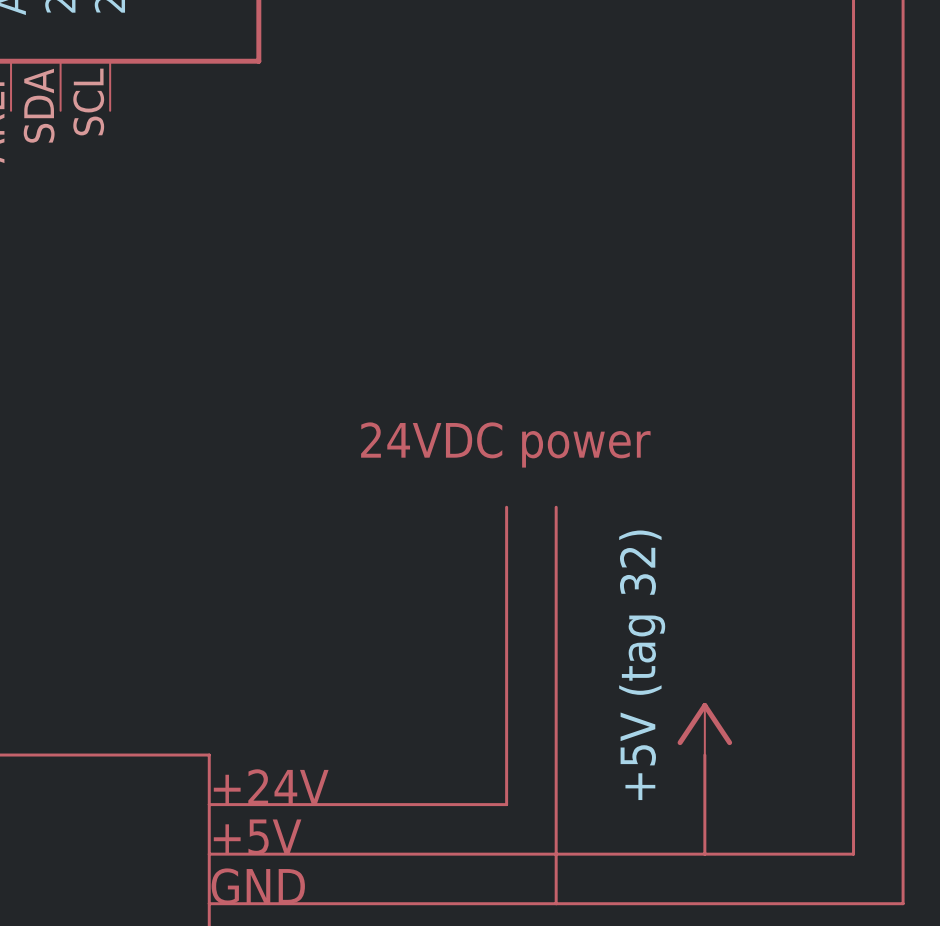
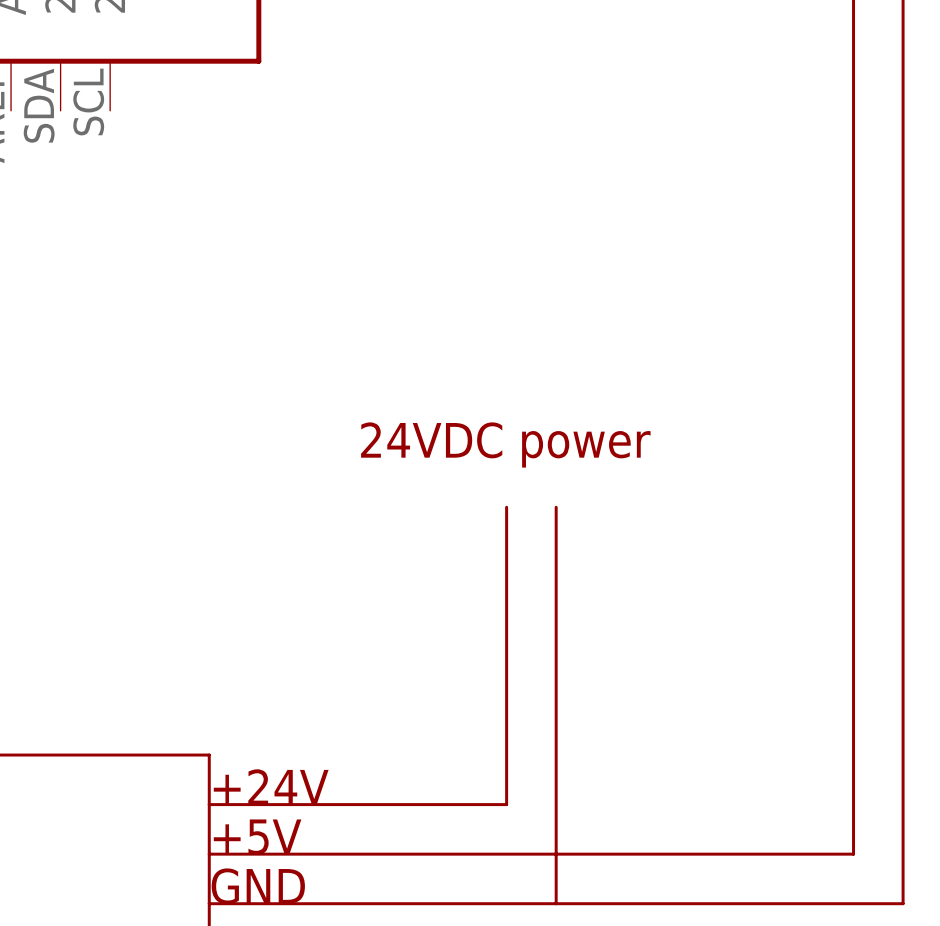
power symbol: +5V (tag 32) (704, 729) -> none
line: (704, 755) (704, 854) -> none

